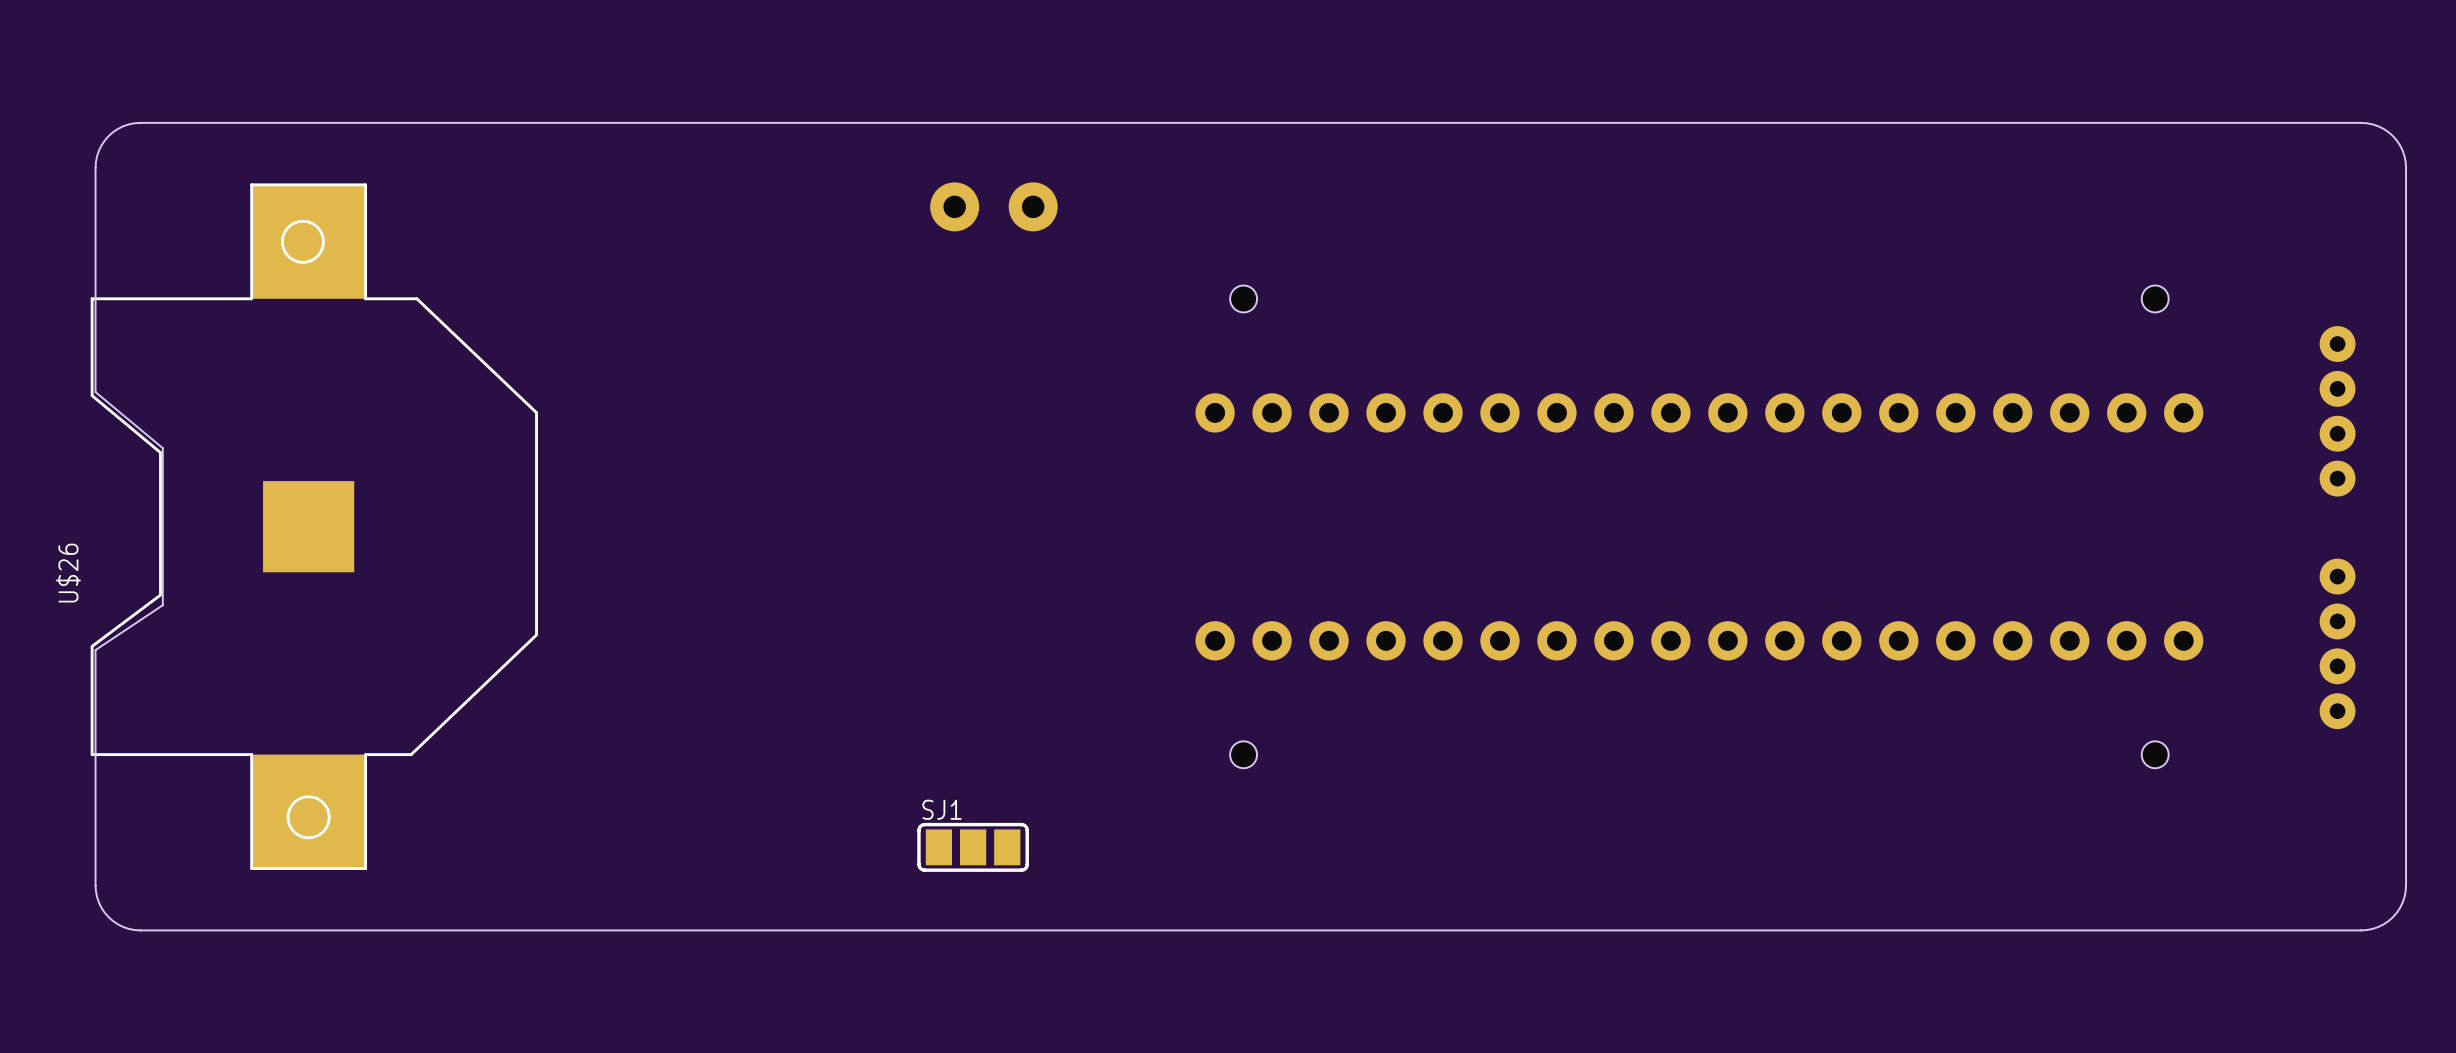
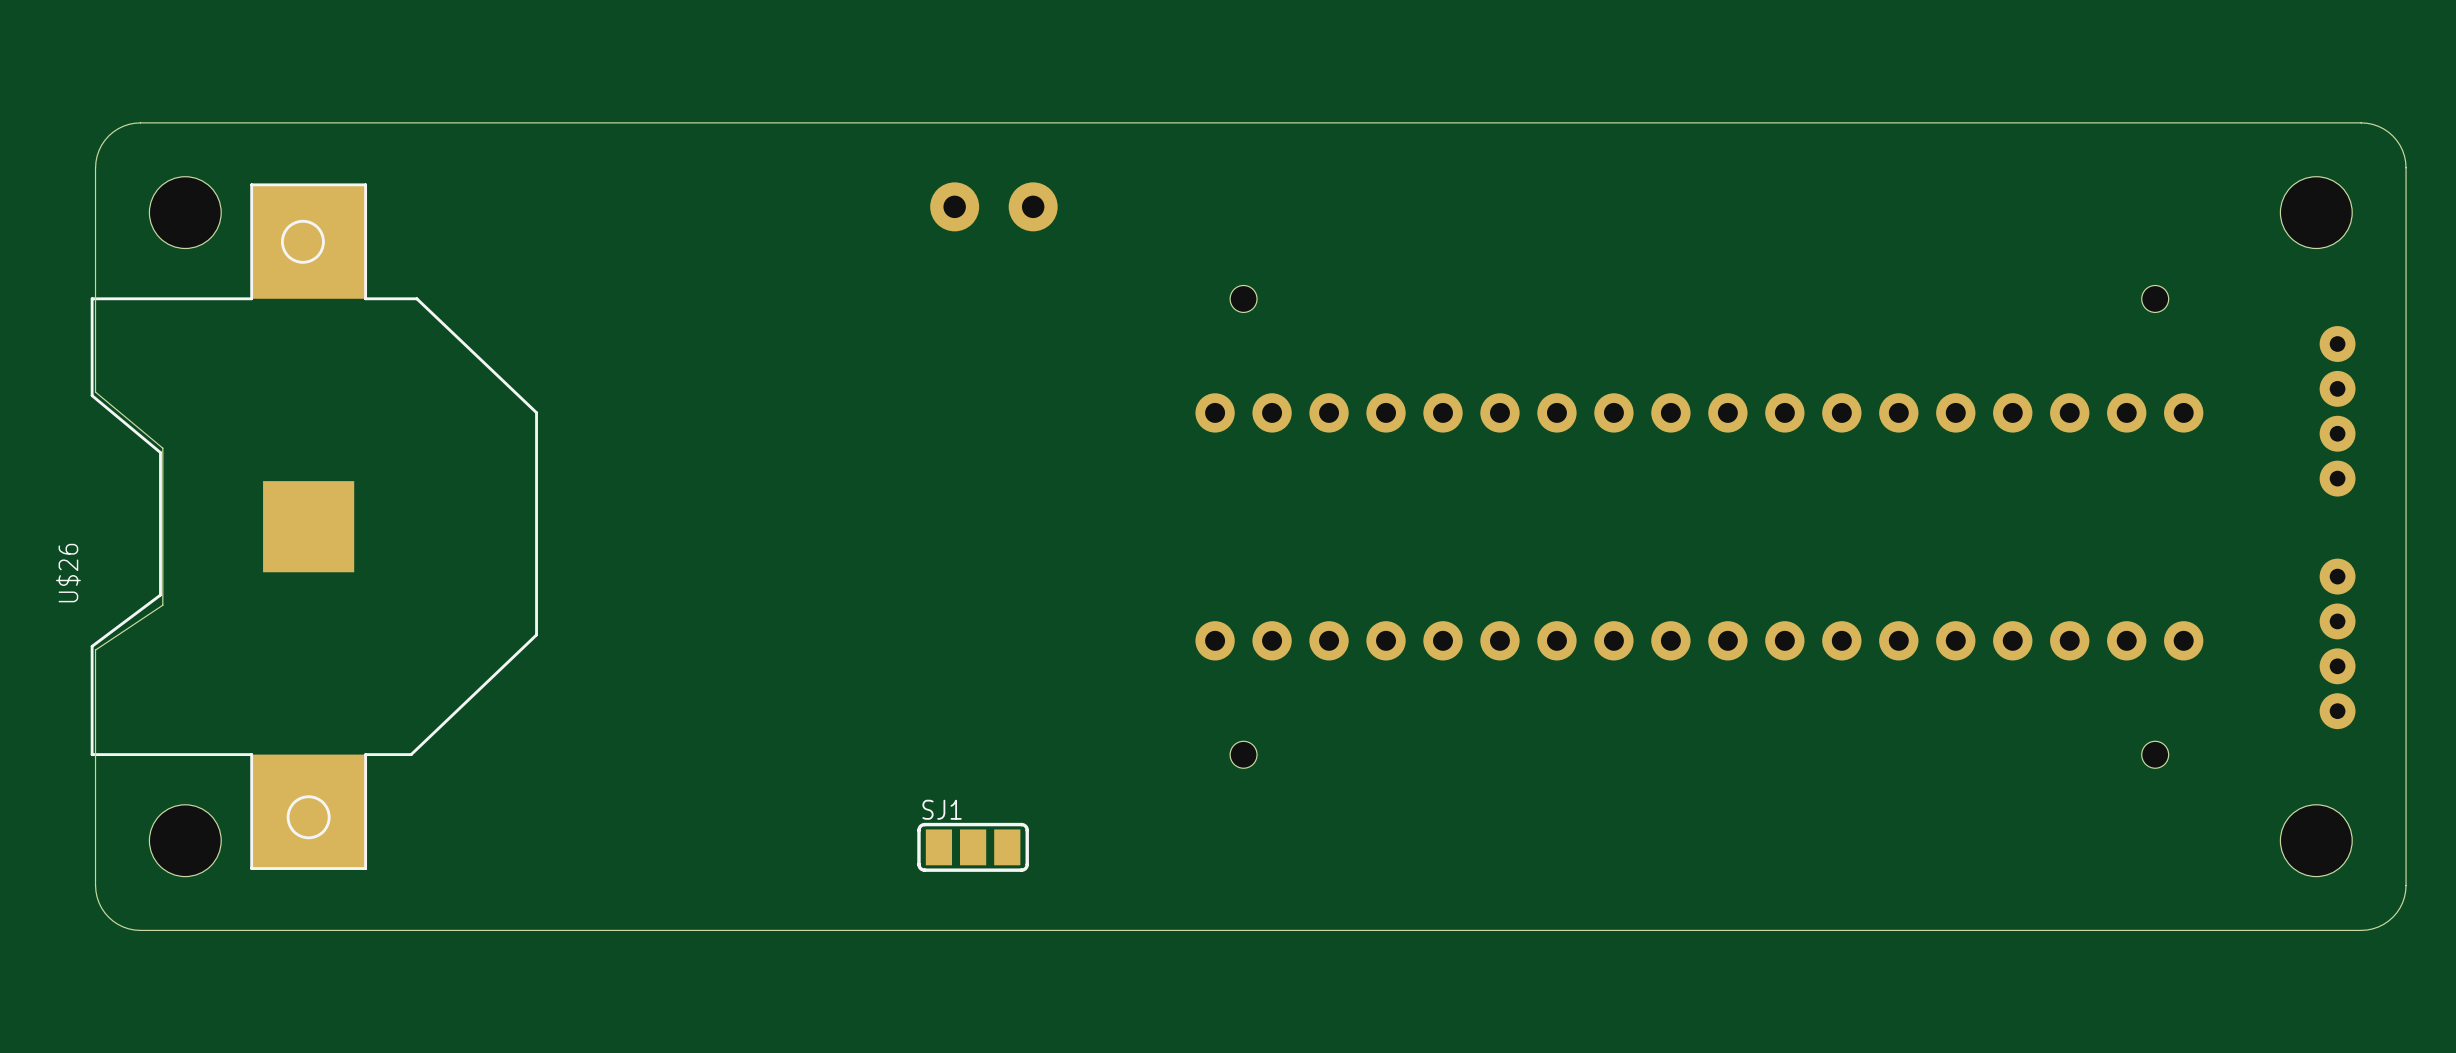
hole: none -> (185, 212)
hole: none -> (2316, 212)
hole: none -> (185, 840)
hole: none -> (2316, 840)

